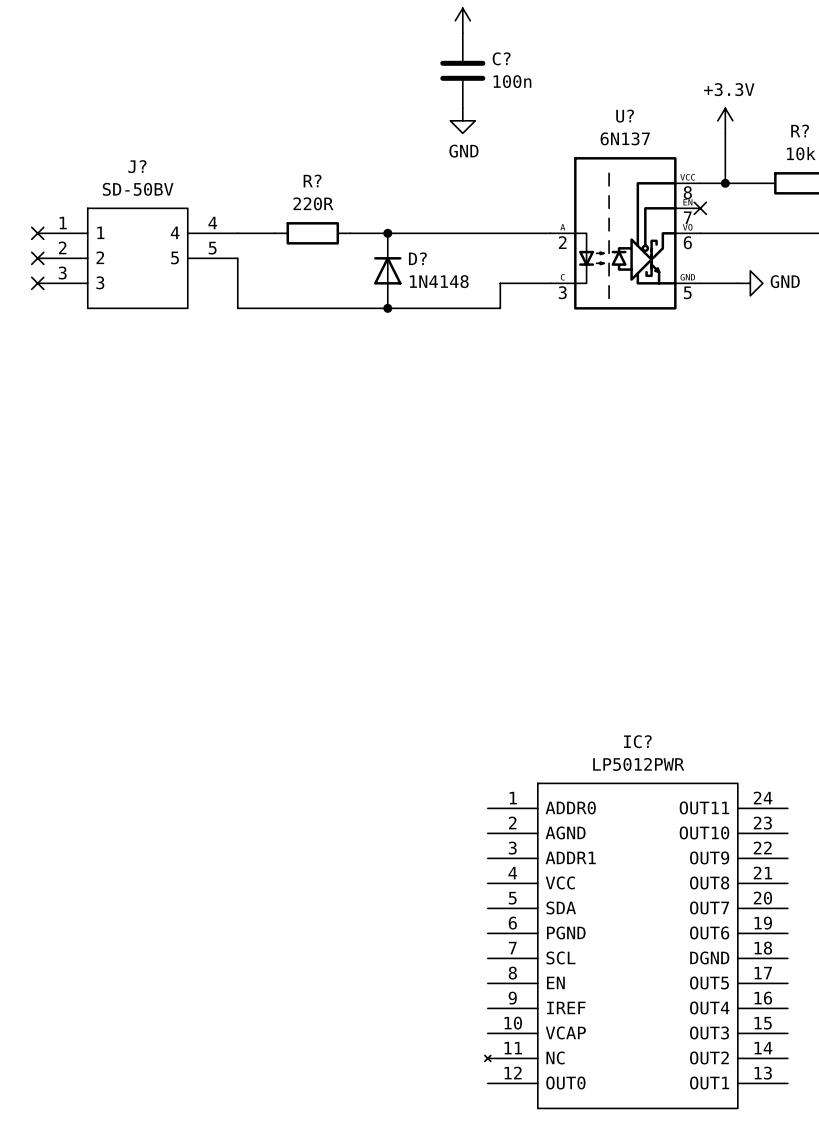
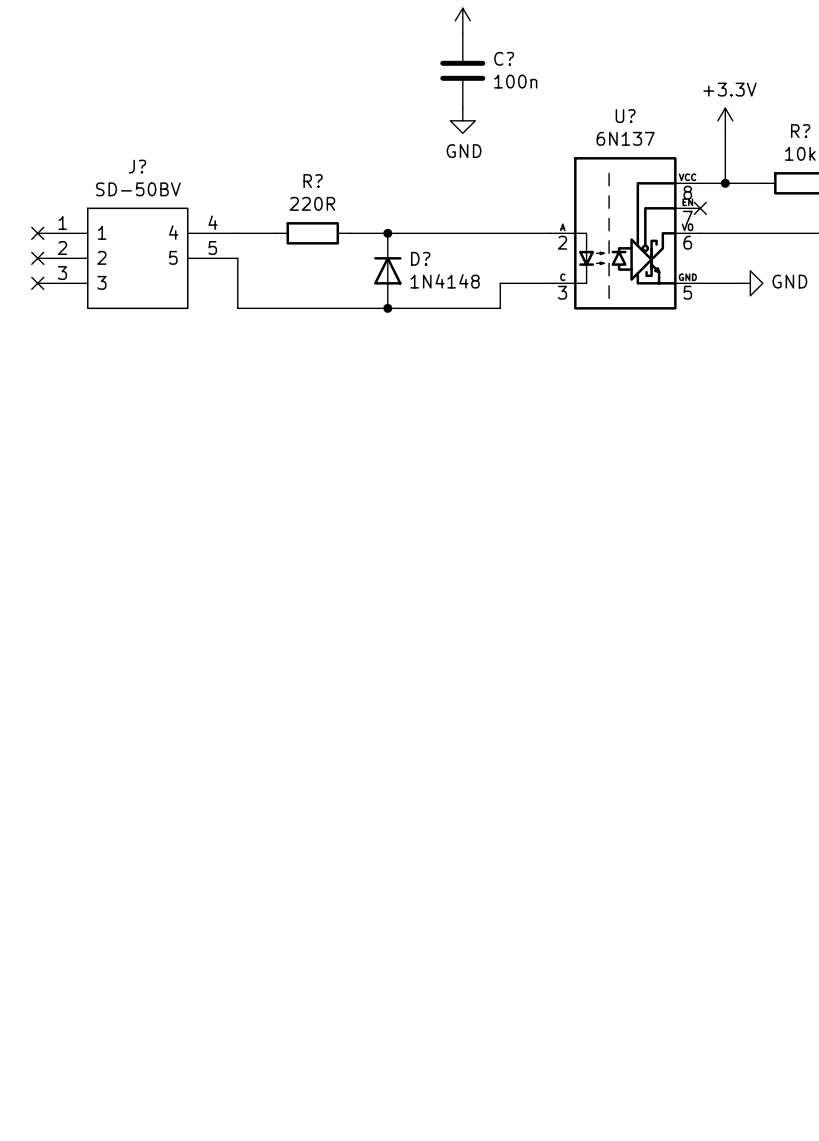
IC?: LP5012PWR (636, 945) -> none

